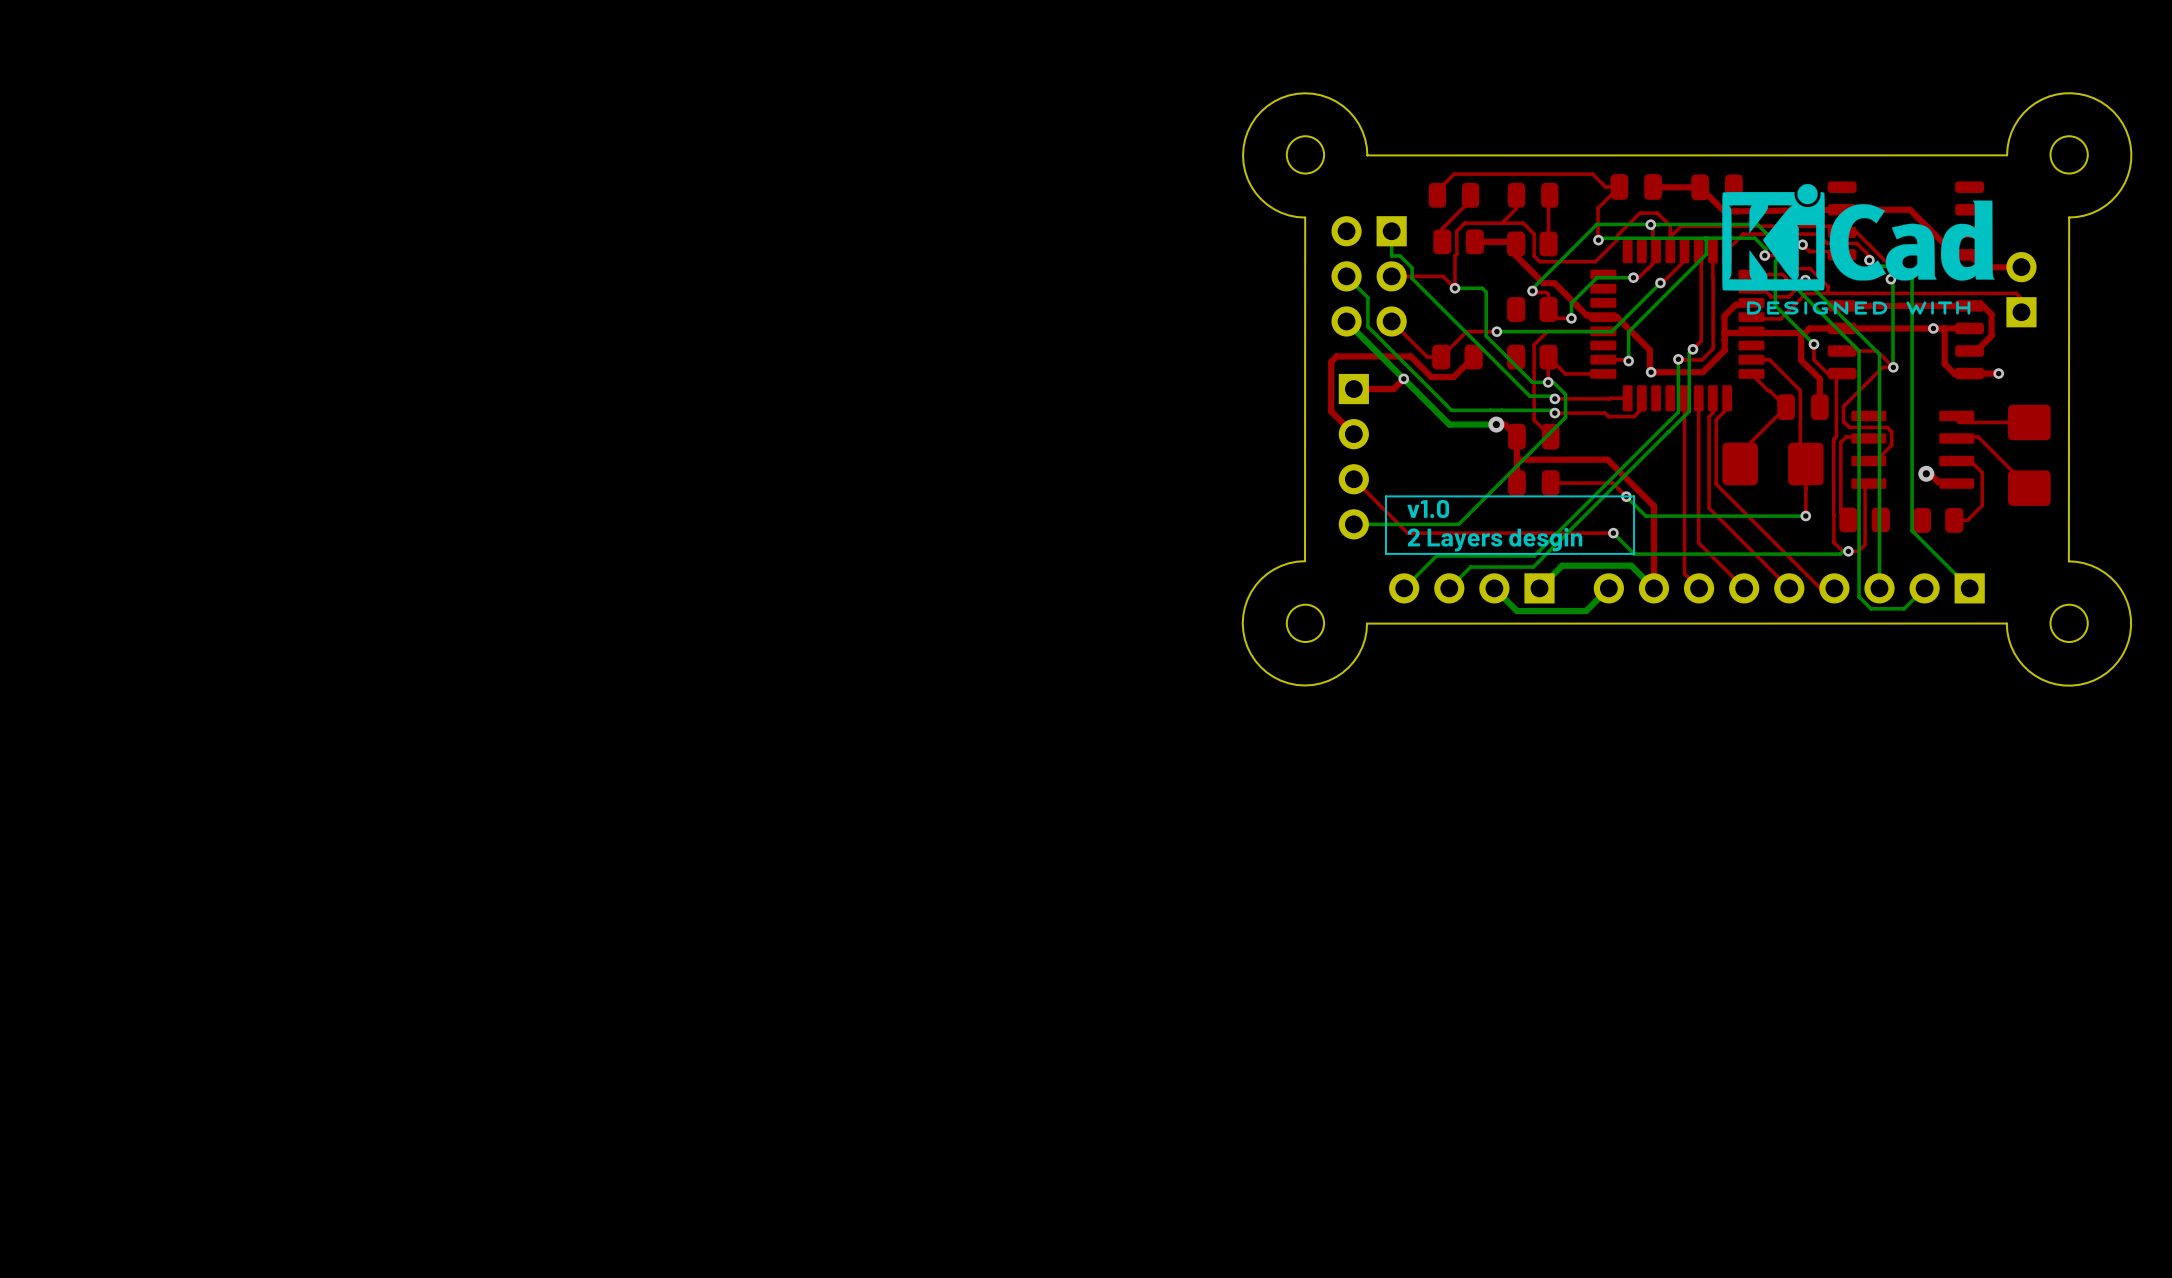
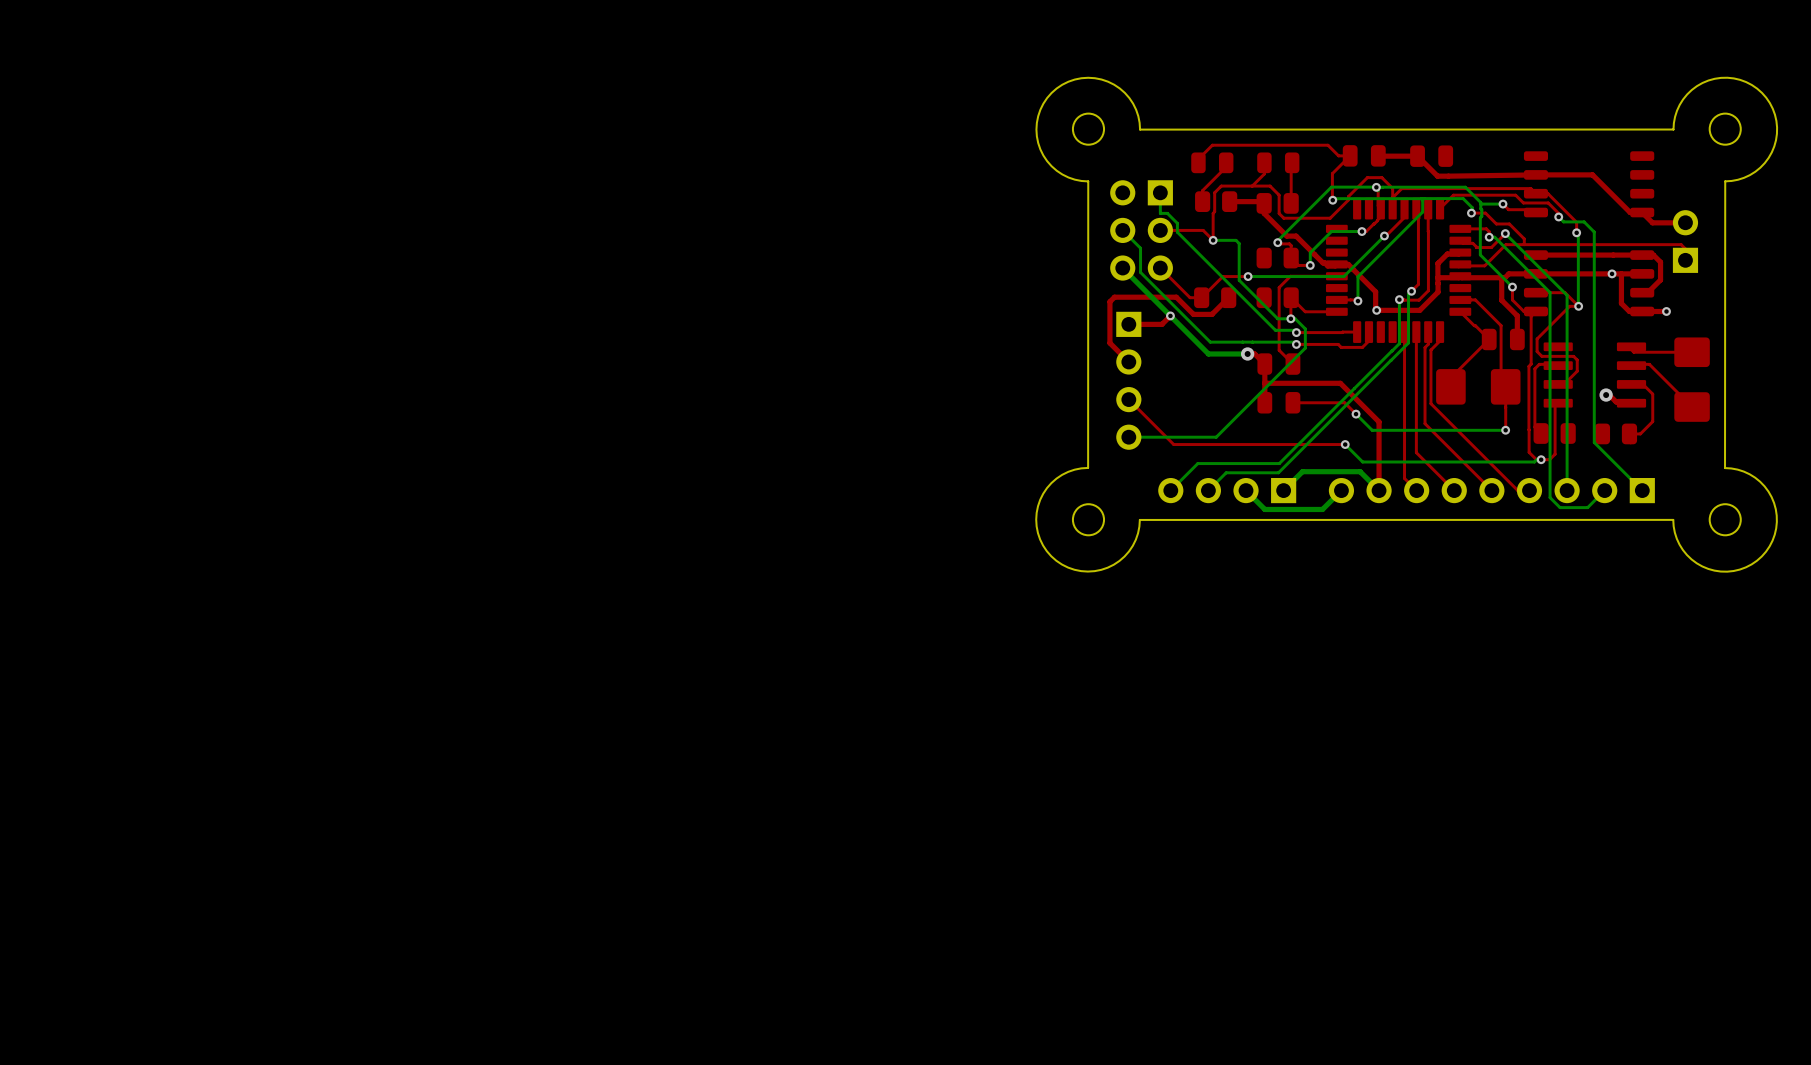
drawing: [1722, 183, 1995, 315] -> none
line: (1634, 496) (1385, 496) (1385, 553) (1634, 553) (1634, 496) -> none
text: v1.0 (1428, 508) -> none
text: 2 Layers desgin (1495, 539) -> none

